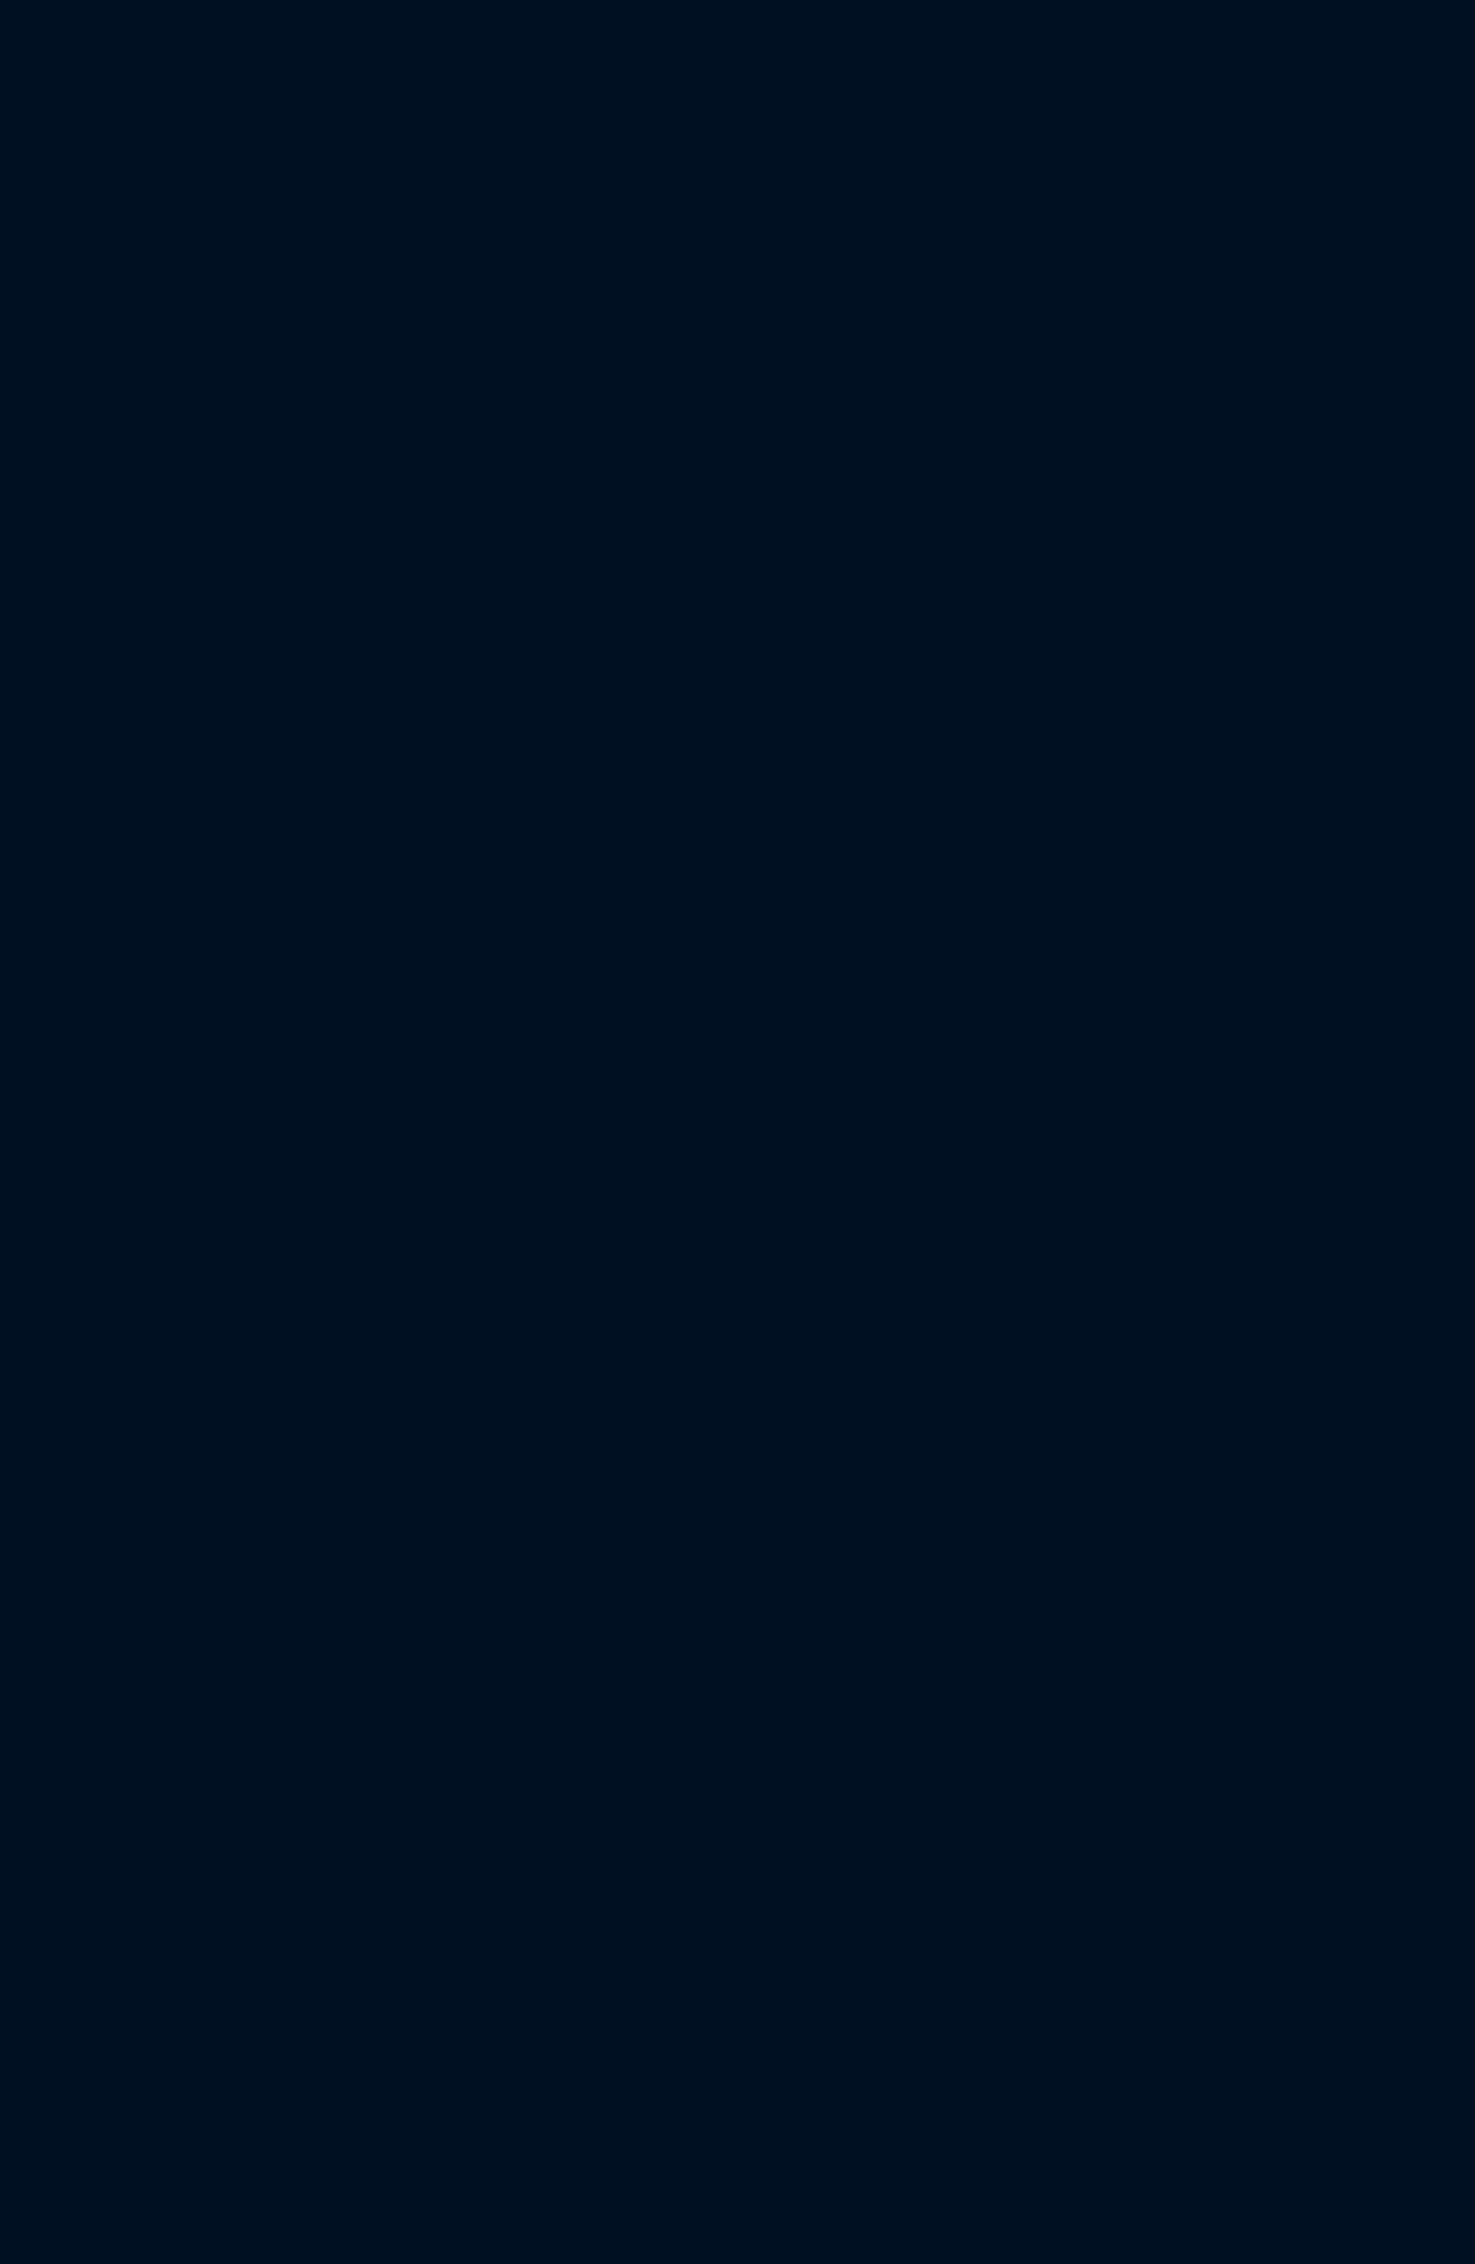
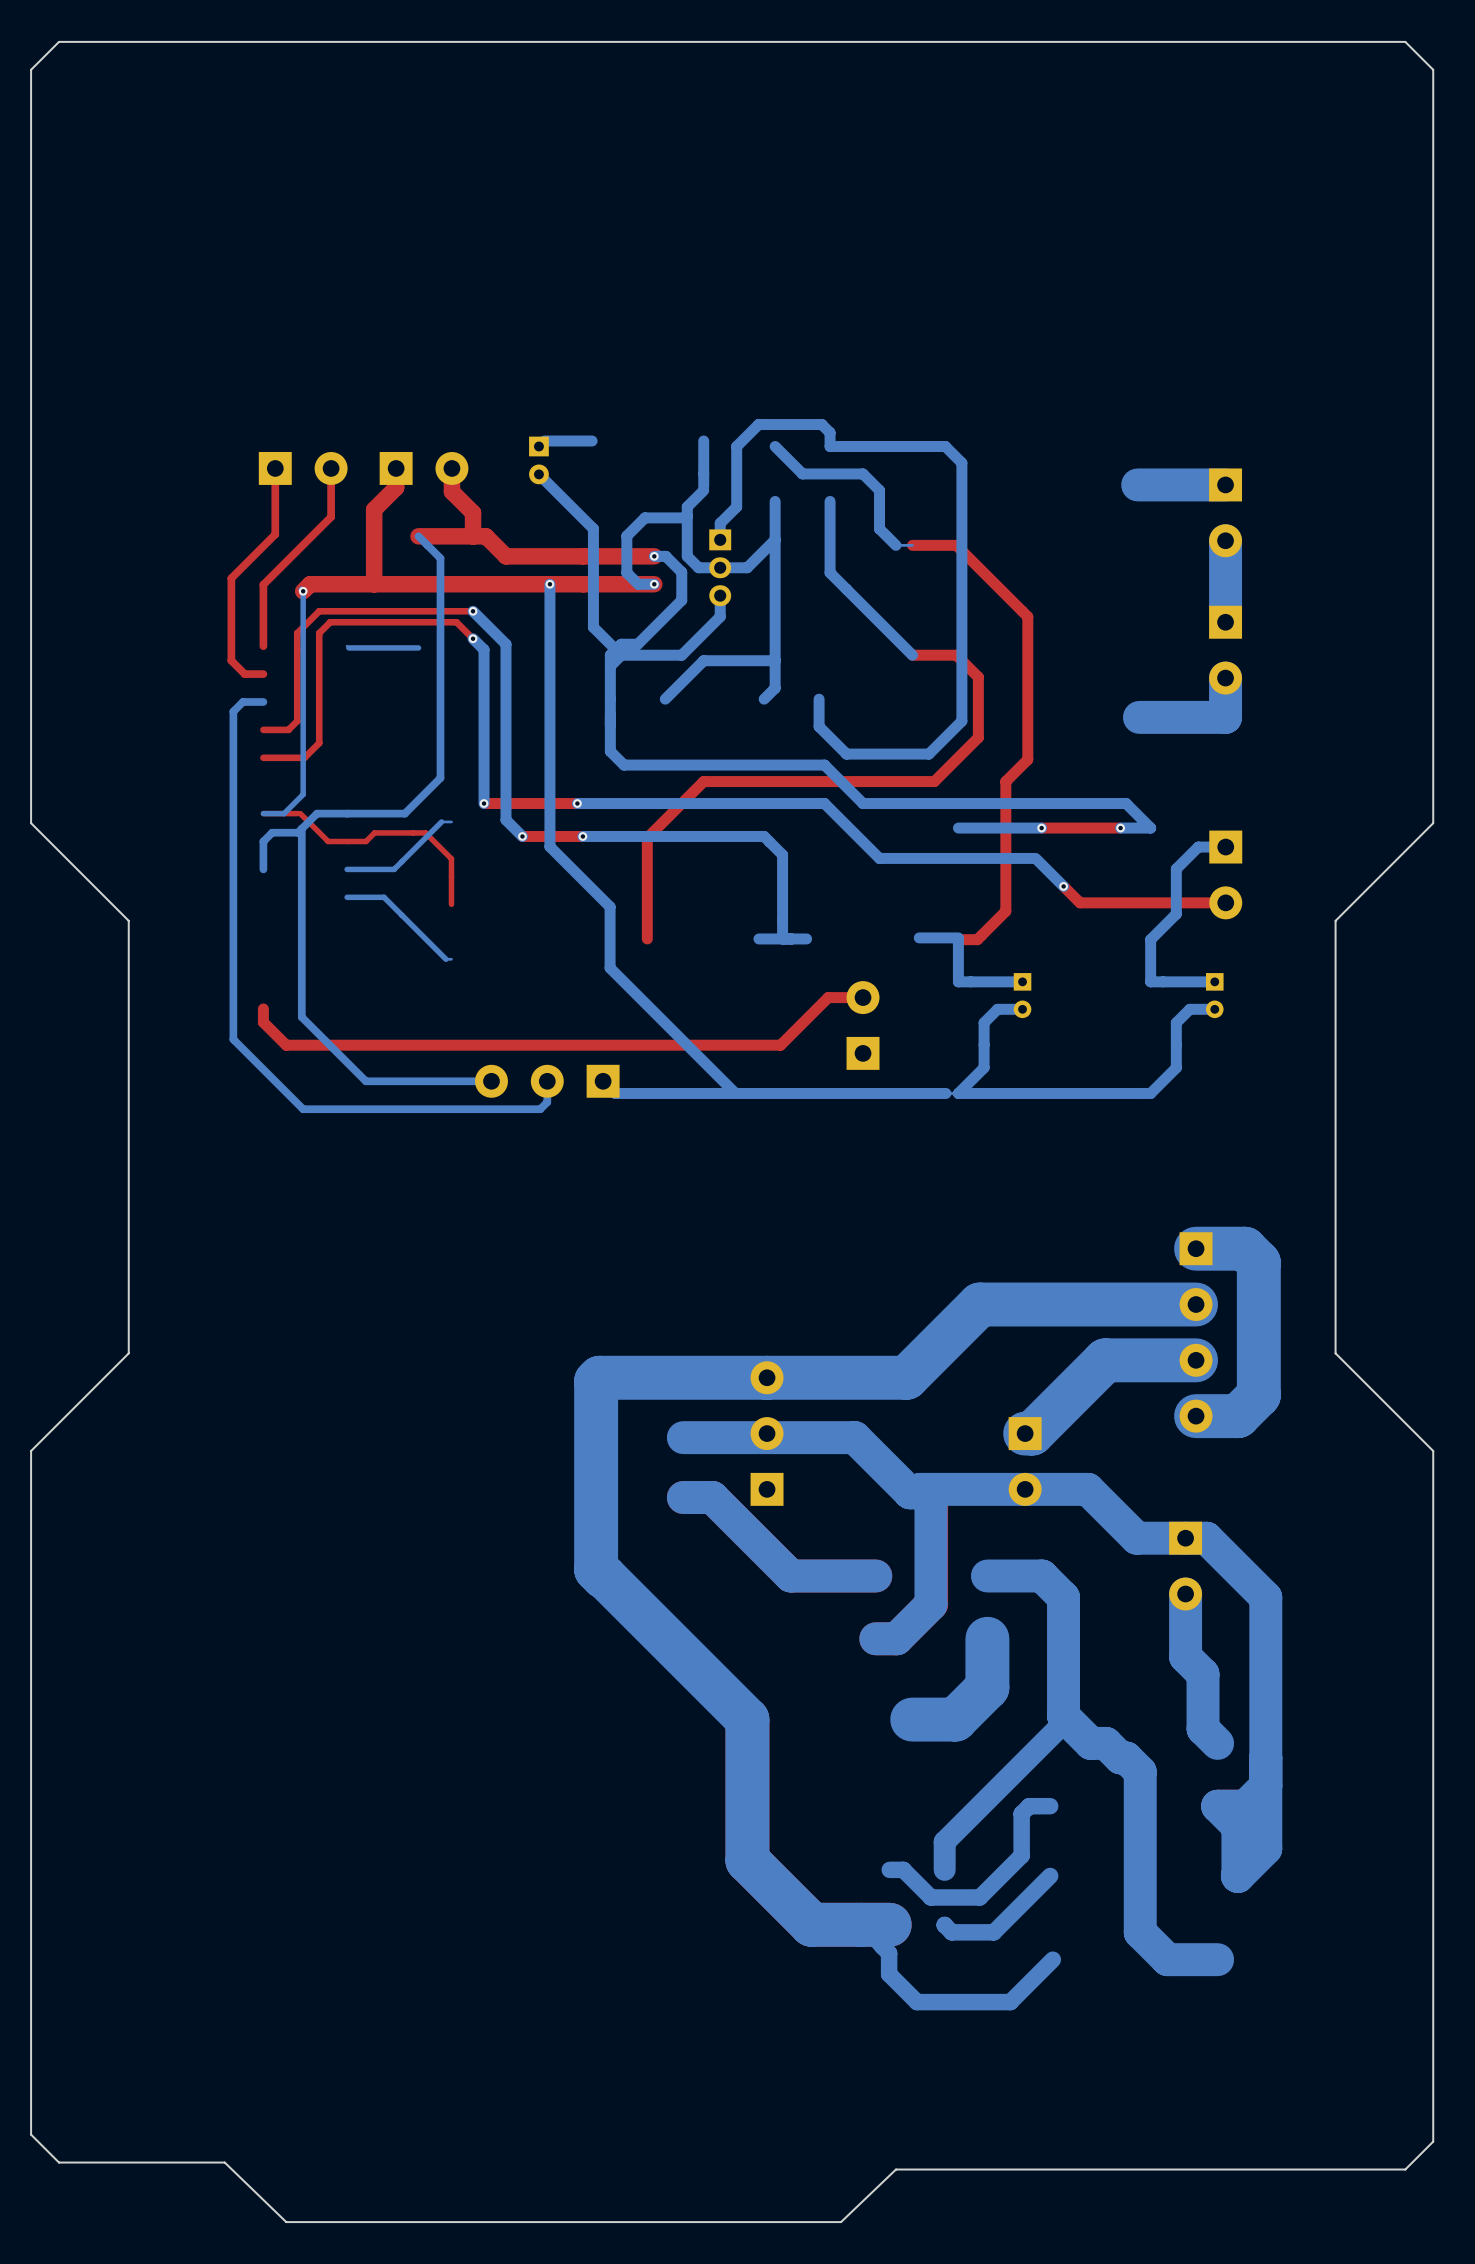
board edge: none -> (1405, 41) (1433, 69) (1433, 823) (1335, 920) (1335, 1353) (1433, 1451) (1433, 2141) (1405, 2169) (895, 2169) (841, 2222) (286, 2222) (224, 2162) (58, 2162) (31, 2134) (31, 1451) (128, 1353) (128, 920) (31, 823) (31, 69) (58, 41) (1405, 41)
bottom track: none -> (592, 441) (544, 441) (538, 446)
bottom track: none -> (703, 441) (703, 490) (687, 506) (687, 556) (698, 567) (747, 567) (775, 539)
bottom track: none -> (775, 446) (802, 473) (863, 473) (879, 490) (879, 528) (895, 545) (912, 545)
part: none -> (538, 460)
top track: none -> (275, 468) (275, 534) (231, 578) (231, 660) (244, 674) (263, 674)
part: none -> (303, 468)
top track: none -> (331, 468) (331, 517) (263, 584) (263, 646)
top track: none -> (396, 468) (396, 487) (374, 509) (374, 584)
part: none -> (424, 468)
top track: none -> (451, 468) (451, 491) (473, 512) (473, 536)
bottom track: none -> (538, 474) (593, 528) (593, 627) (615, 649)
bottom track: none -> (1206, 484) (1225, 484) (1137, 484) (1132, 490)
bottom track: none -> (775, 501) (775, 688) (764, 699)
bottom track: none -> (830, 501) (830, 572) (912, 655)
part: none -> (1225, 512)
bottom track: none -> (687, 516) (685, 517) (644, 517) (626, 536) (626, 572) (638, 584) (654, 584)
top track: none -> (418, 536) (485, 536) (505, 556) (654, 556)
bottom track: none -> (418, 536) (440, 558) (440, 778) (404, 813) (317, 813) (297, 832) (272, 832) (263, 841) (263, 869)
bottom track: none -> (720, 539) (720, 523) (736, 506) (736, 446) (758, 424) (821, 424) (830, 432) (830, 446) (945, 446) (961, 462) (961, 721) (928, 754) (846, 754) (819, 726) (819, 699)
bottom track: none -> (1225, 540) (1225, 605)
top track: none -> (912, 545) (956, 545) (1027, 616) (1027, 759) (1005, 781) (1005, 911) (977, 939) (958, 939)
bottom track: none -> (654, 556) (665, 556) (681, 572) (681, 600) (637, 644) (621, 644) (610, 655) (610, 751) (624, 765) (824, 765) (863, 803) (1126, 803) (1150, 828) (1120, 828)
via: none -> (654, 556)
part: none -> (720, 567)
bottom track: none -> (549, 584) (549, 846) (610, 906) (610, 968) (735, 1093)
via: none -> (549, 584)
top track: none -> (654, 584) (310, 584) (303, 591)
via: none -> (654, 584)
bottom track: none -> (301, 589) (303, 591) (303, 794) (284, 813) (263, 813)
via: none -> (303, 591)
bottom track: none -> (720, 595) (720, 616) (681, 655) (621, 655) (610, 666) (610, 715)
top track: none -> (473, 611) (319, 611) (297, 633) (297, 721) (288, 729) (263, 729)
bottom track: none -> (473, 611) (505, 644) (505, 820) (522, 836)
via: none -> (473, 611)
top track: none -> (473, 638) (456, 622) (330, 622) (319, 633) (319, 743) (304, 757) (263, 757)
bottom track: none -> (473, 638) (484, 649) (484, 803)
via: none -> (473, 638)
bottom track: none -> (347, 646) (348, 647) (418, 647)
part: none -> (1225, 650)
top track: none -> (912, 655) (956, 655) (978, 677) (978, 737) (934, 781) (703, 781) (647, 837) (647, 938)
bottom track: none -> (775, 660) (703, 660) (665, 699)
bottom track: none -> (1225, 678) (1225, 717) (1139, 717) (1132, 710)
bottom track: none -> (263, 701) (242, 701) (233, 711) (233, 1039) (303, 1109) (540, 1109) (547, 1102) (547, 1081)
via: none -> (484, 803)
top track: none -> (577, 803) (484, 803)
bottom track: none -> (577, 803) (824, 803) (879, 858) (1035, 858) (1063, 886)
via: none -> (577, 803)
top track: none -> (263, 813) (300, 813) (328, 841) (366, 841) (374, 832) (425, 832) (451, 858) (451, 904)
bottom track: none -> (451, 821) (441, 821) (394, 869) (347, 869)
bottom track: none -> (301, 828) (301, 1017) (365, 1081) (491, 1081)
bottom track: none -> (1041, 828) (958, 828)
via: none -> (1041, 828)
top track: none -> (1120, 828) (1041, 828)
via: none -> (1120, 828)
via: none -> (522, 836)
top track: none -> (582, 836) (522, 836)
bottom track: none -> (582, 836) (764, 836) (782, 854) (782, 938)
via: none -> (582, 836)
bottom track: none -> (1225, 847) (1198, 847) (1176, 869) (1176, 914) (1150, 939)
part: none -> (1225, 874)
top track: none -> (1063, 886) (1080, 902) (1225, 902)
via: none -> (1063, 886)
bottom track: none -> (347, 897) (384, 897) (445, 959) (451, 959)
bottom track: none -> (958, 937) (918, 938)
bottom track: none -> (806, 938) (758, 938)
bottom track: none -> (1150, 939) (1150, 981) (1214, 981)
bottom track: none -> (958, 940) (958, 981) (1022, 981)
part: none -> (1022, 995)
part: none -> (1214, 995)
top track: none -> (863, 997) (828, 997) (780, 1045)
top track: none -> (263, 1008) (263, 1022) (286, 1045) (780, 1045)
bottom track: none -> (1022, 1009) (997, 1009) (984, 1022) (984, 1067) (958, 1093)
bottom track: none -> (1214, 1009) (1189, 1009) (1176, 1022) (1176, 1067) (1150, 1093) (958, 1093)
part: none -> (863, 1025)
part: none -> (547, 1081)
bottom track: none -> (603, 1081) (615, 1093) (958, 1093)
bottom track: none -> (1196, 1248) (1244, 1248) (1258, 1262) (1258, 1395) (1237, 1416) (1196, 1416)
bottom track: none -> (1196, 1304) (979, 1304) (906, 1377) (599, 1377) (596, 1381) (596, 1569) (747, 1719) (747, 1860) (811, 1924) (889, 1924)
part: none -> (1196, 1332)
bottom track: none -> (1196, 1360) (1105, 1360) (1032, 1433) (1025, 1433)
part: none -> (767, 1433)
bottom track: none -> (683, 1437) (854, 1437) (910, 1492) (917, 1492) (920, 1489)
part: none -> (1025, 1461)
bottom track: none -> (920, 1489) (1087, 1489) (1136, 1538) (1206, 1538) (1265, 1597) (1265, 1848) (1237, 1876) (1237, 1826) (1217, 1806) (1244, 1806) (1265, 1785)
bottom track: none -> (920, 1489) (930, 1499) (930, 1604) (896, 1638) (875, 1638)
bottom track: none -> (683, 1497) (712, 1497) (790, 1576) (875, 1576)
part: none -> (1185, 1566)
bottom track: none -> (987, 1576) (1042, 1576) (1063, 1597) (1063, 1716)
bottom track: none -> (1185, 1594) (1185, 1656) (1203, 1674) (1203, 1728) (1217, 1743)
bottom track: none -> (987, 1638) (987, 1687) (955, 1719) (912, 1719)
bottom track: none -> (1063, 1716) (1090, 1743) (1106, 1743) (1120, 1757) (1126, 1757) (1140, 1771) (1140, 1932) (1167, 1959) (1217, 1959)
bottom track: none -> (1063, 1716) (1063, 1723) (944, 1841) (944, 1869)
bottom track: none -> (1050, 1806) (1029, 1806) (1021, 1813) (1021, 1855) (979, 1897) (930, 1897) (903, 1869) (889, 1869)
bottom track: none -> (1050, 1875) (993, 1932) (951, 1932) (944, 1924)
bottom track: none -> (861, 1924) (889, 1953) (889, 1974) (917, 2002) (1010, 2002) (1052, 1959)

